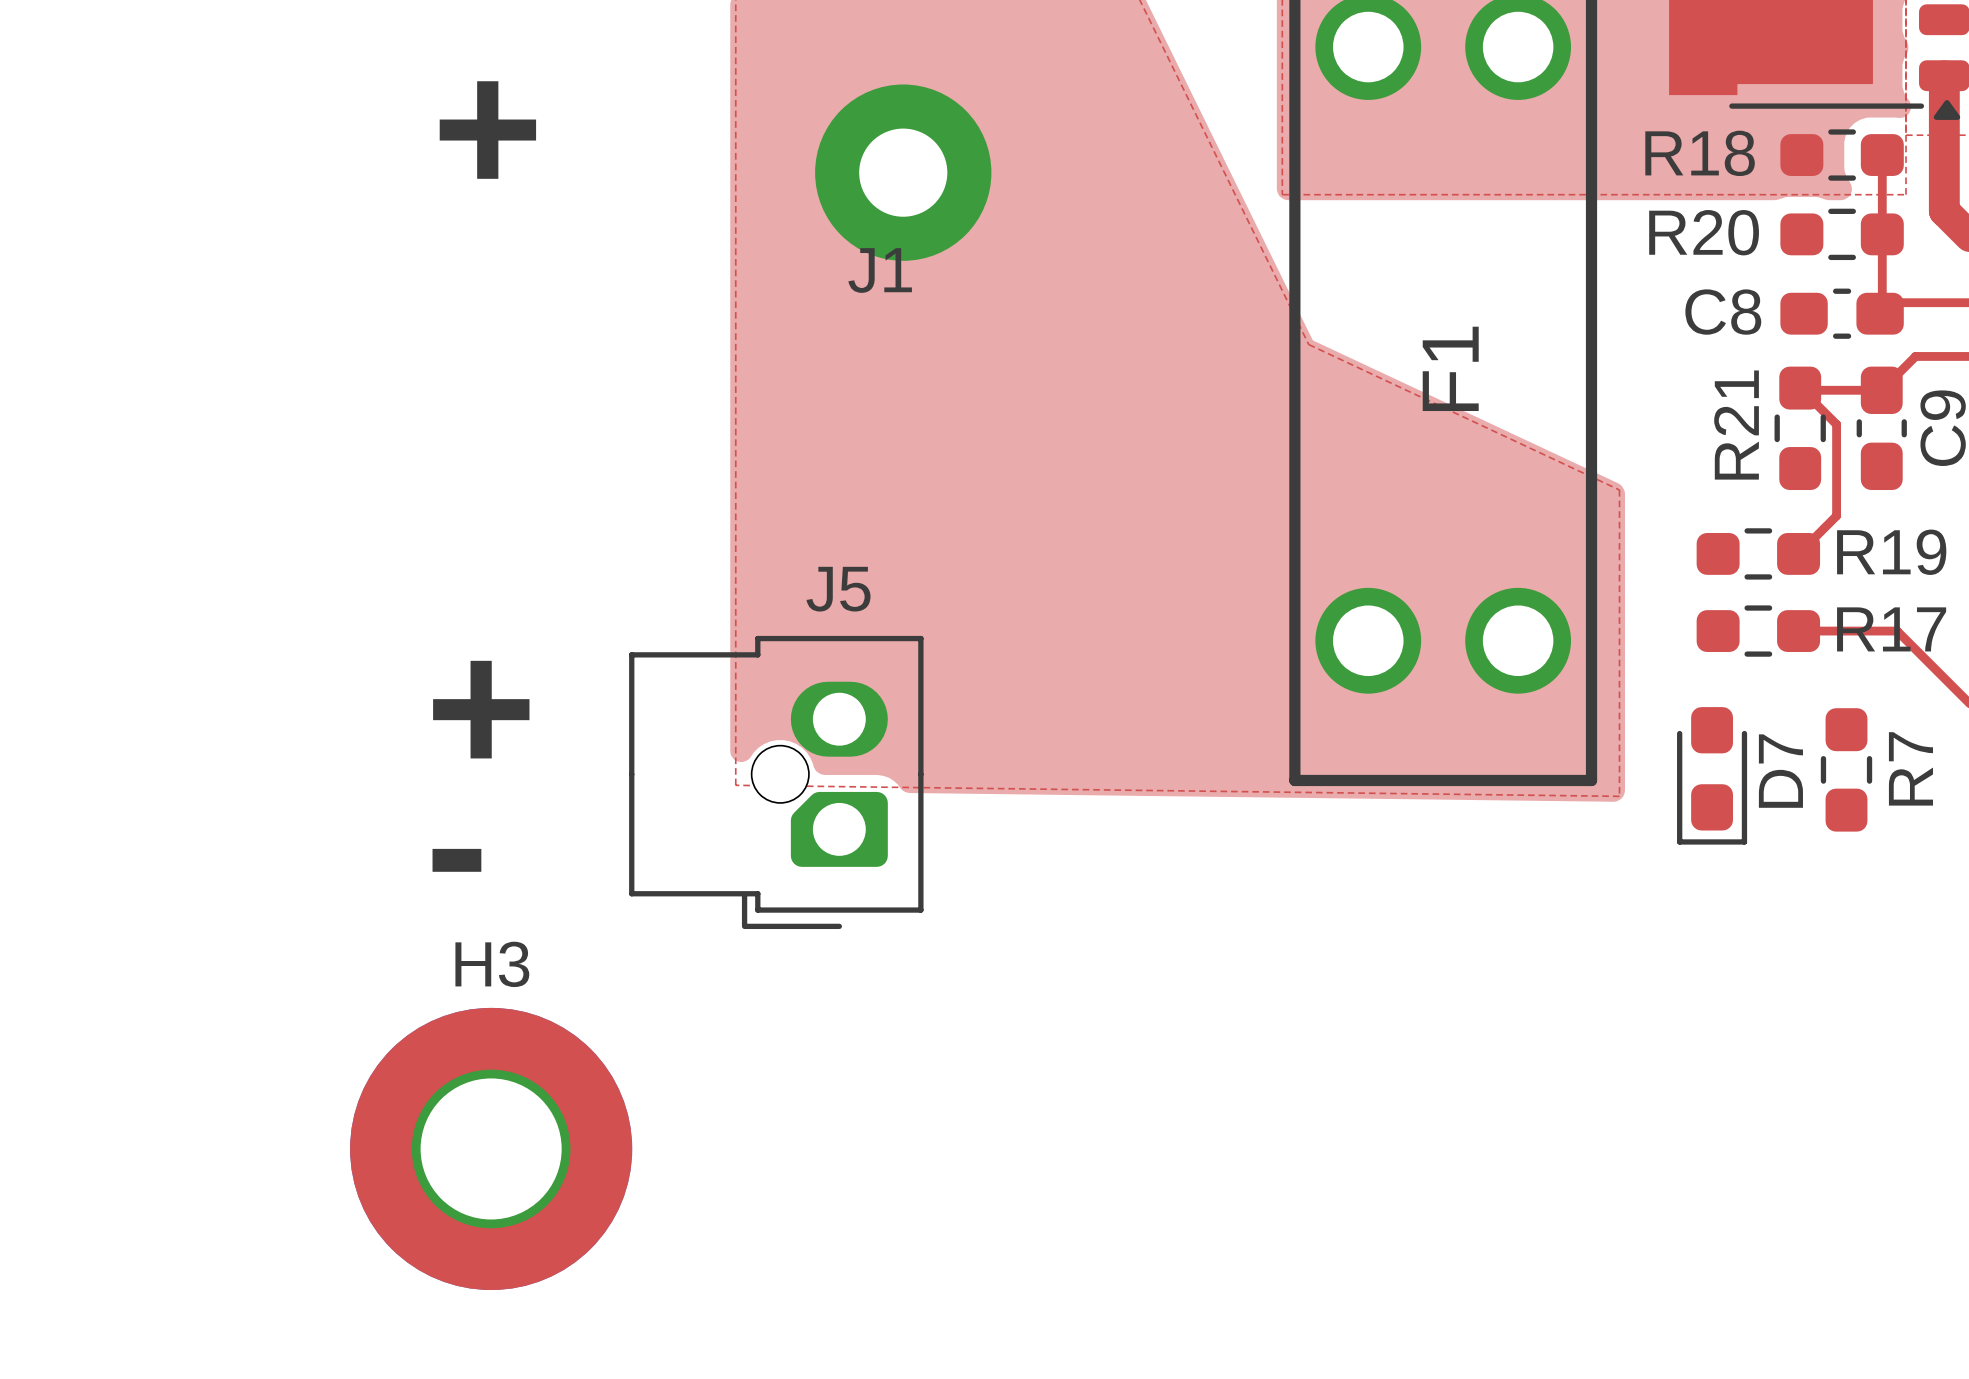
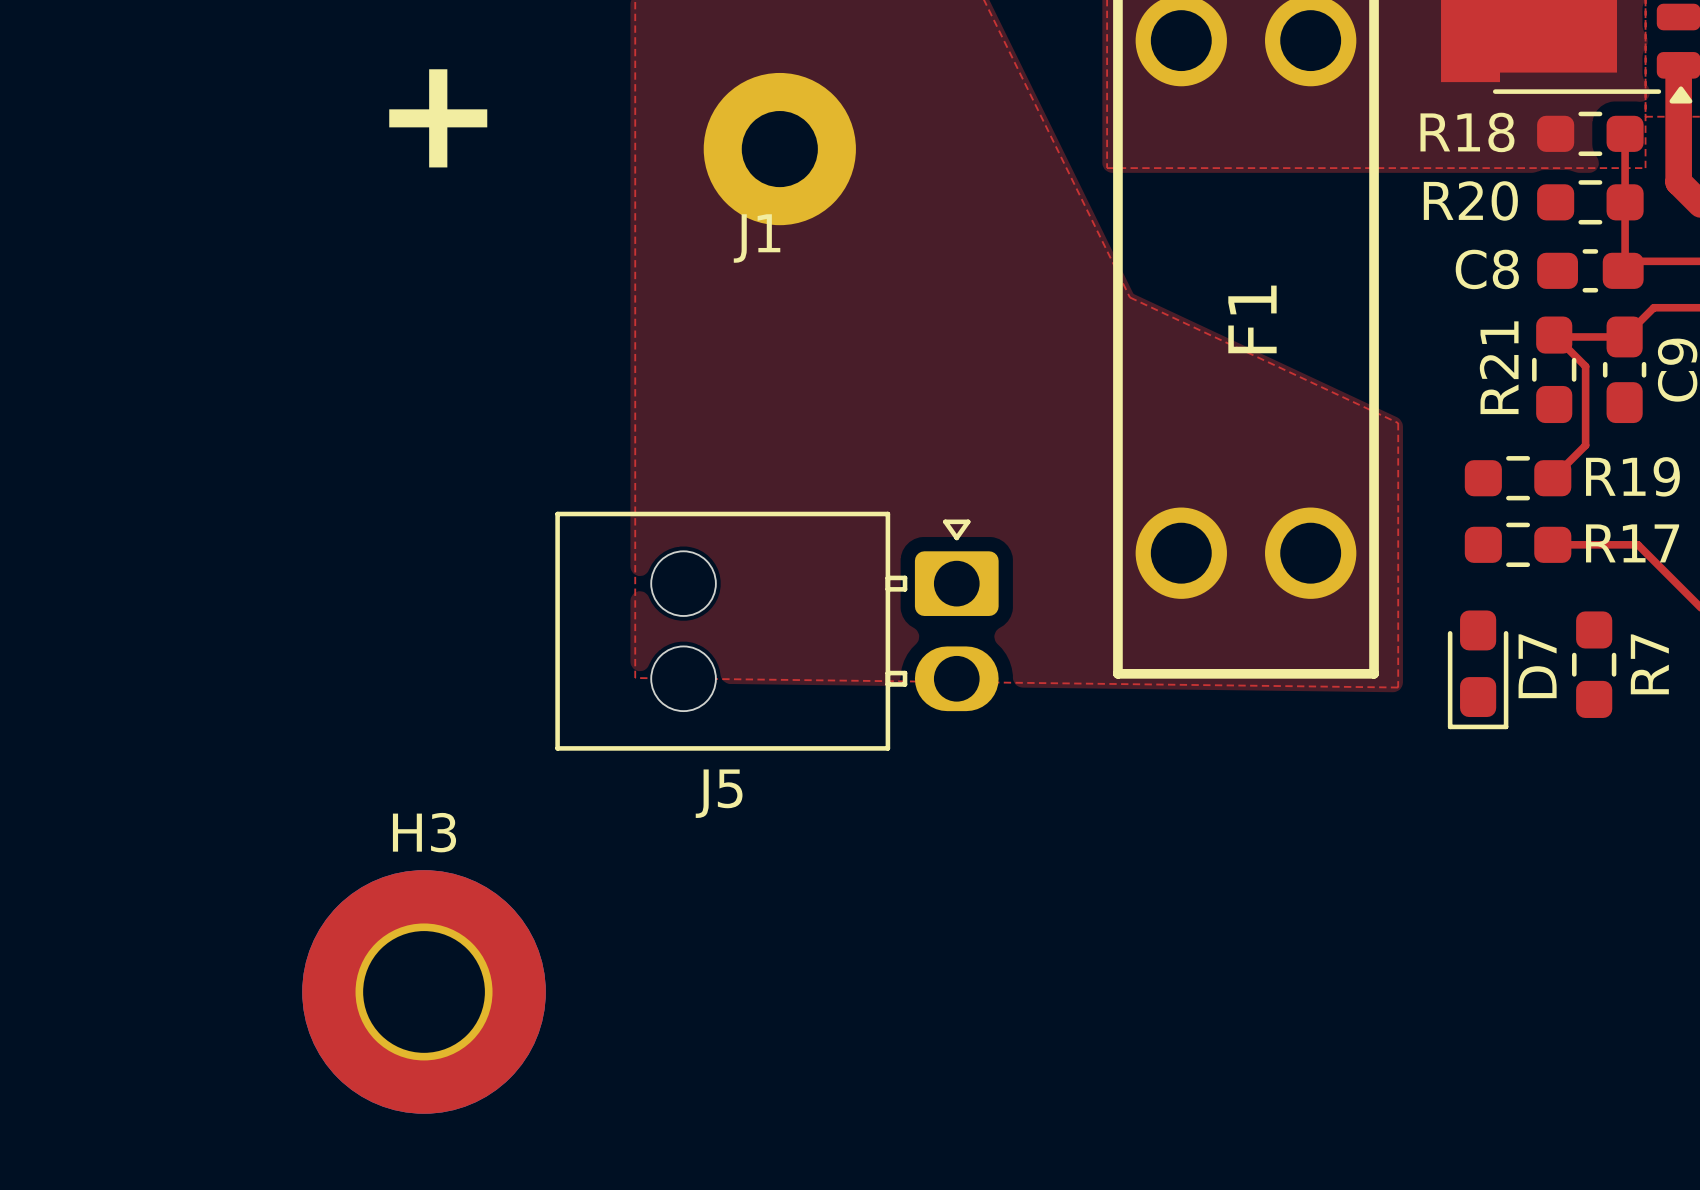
J5 name position: J5 (838, 589) -> J5 (719, 793)
J5 footprint: [629, 635, 924, 930] -> [555, 511, 999, 751]
text: + (481, 709) -> none
text: - (456, 860) -> none

